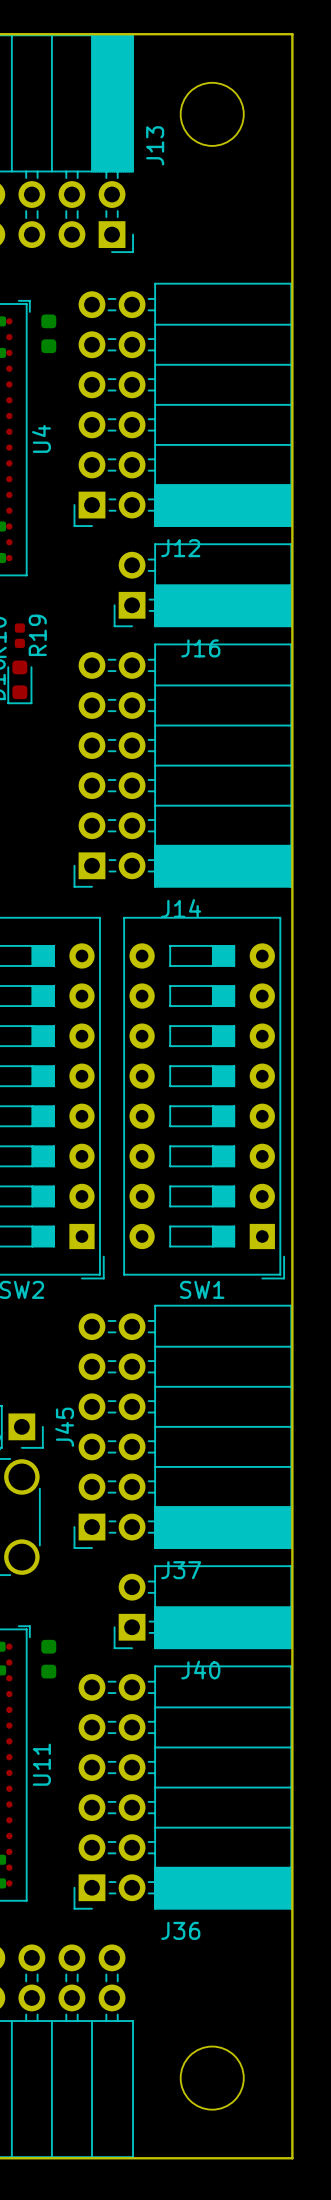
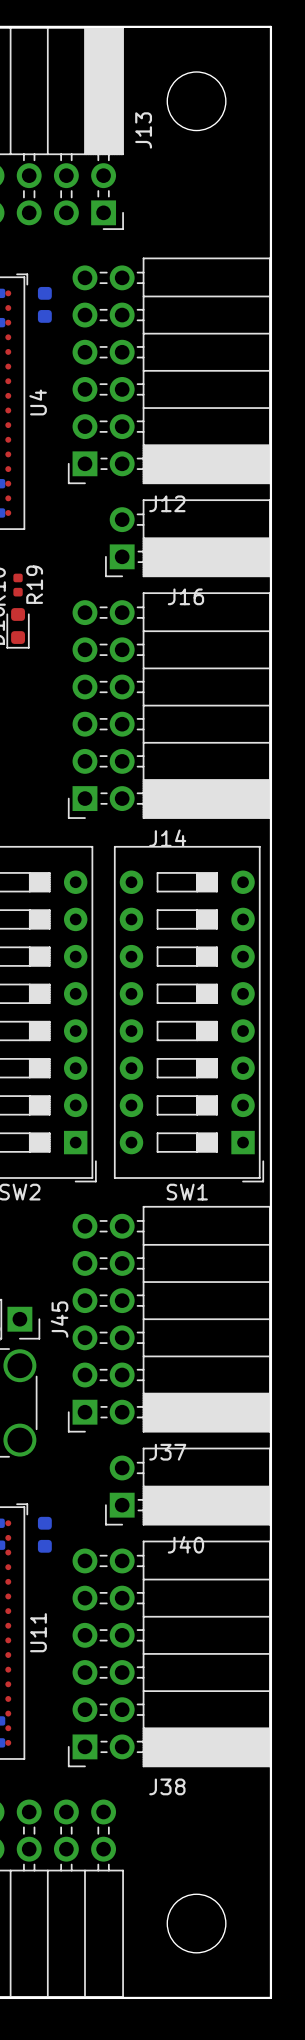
J36 name: J36 (180, 1930) -> J38 (167, 1786)

